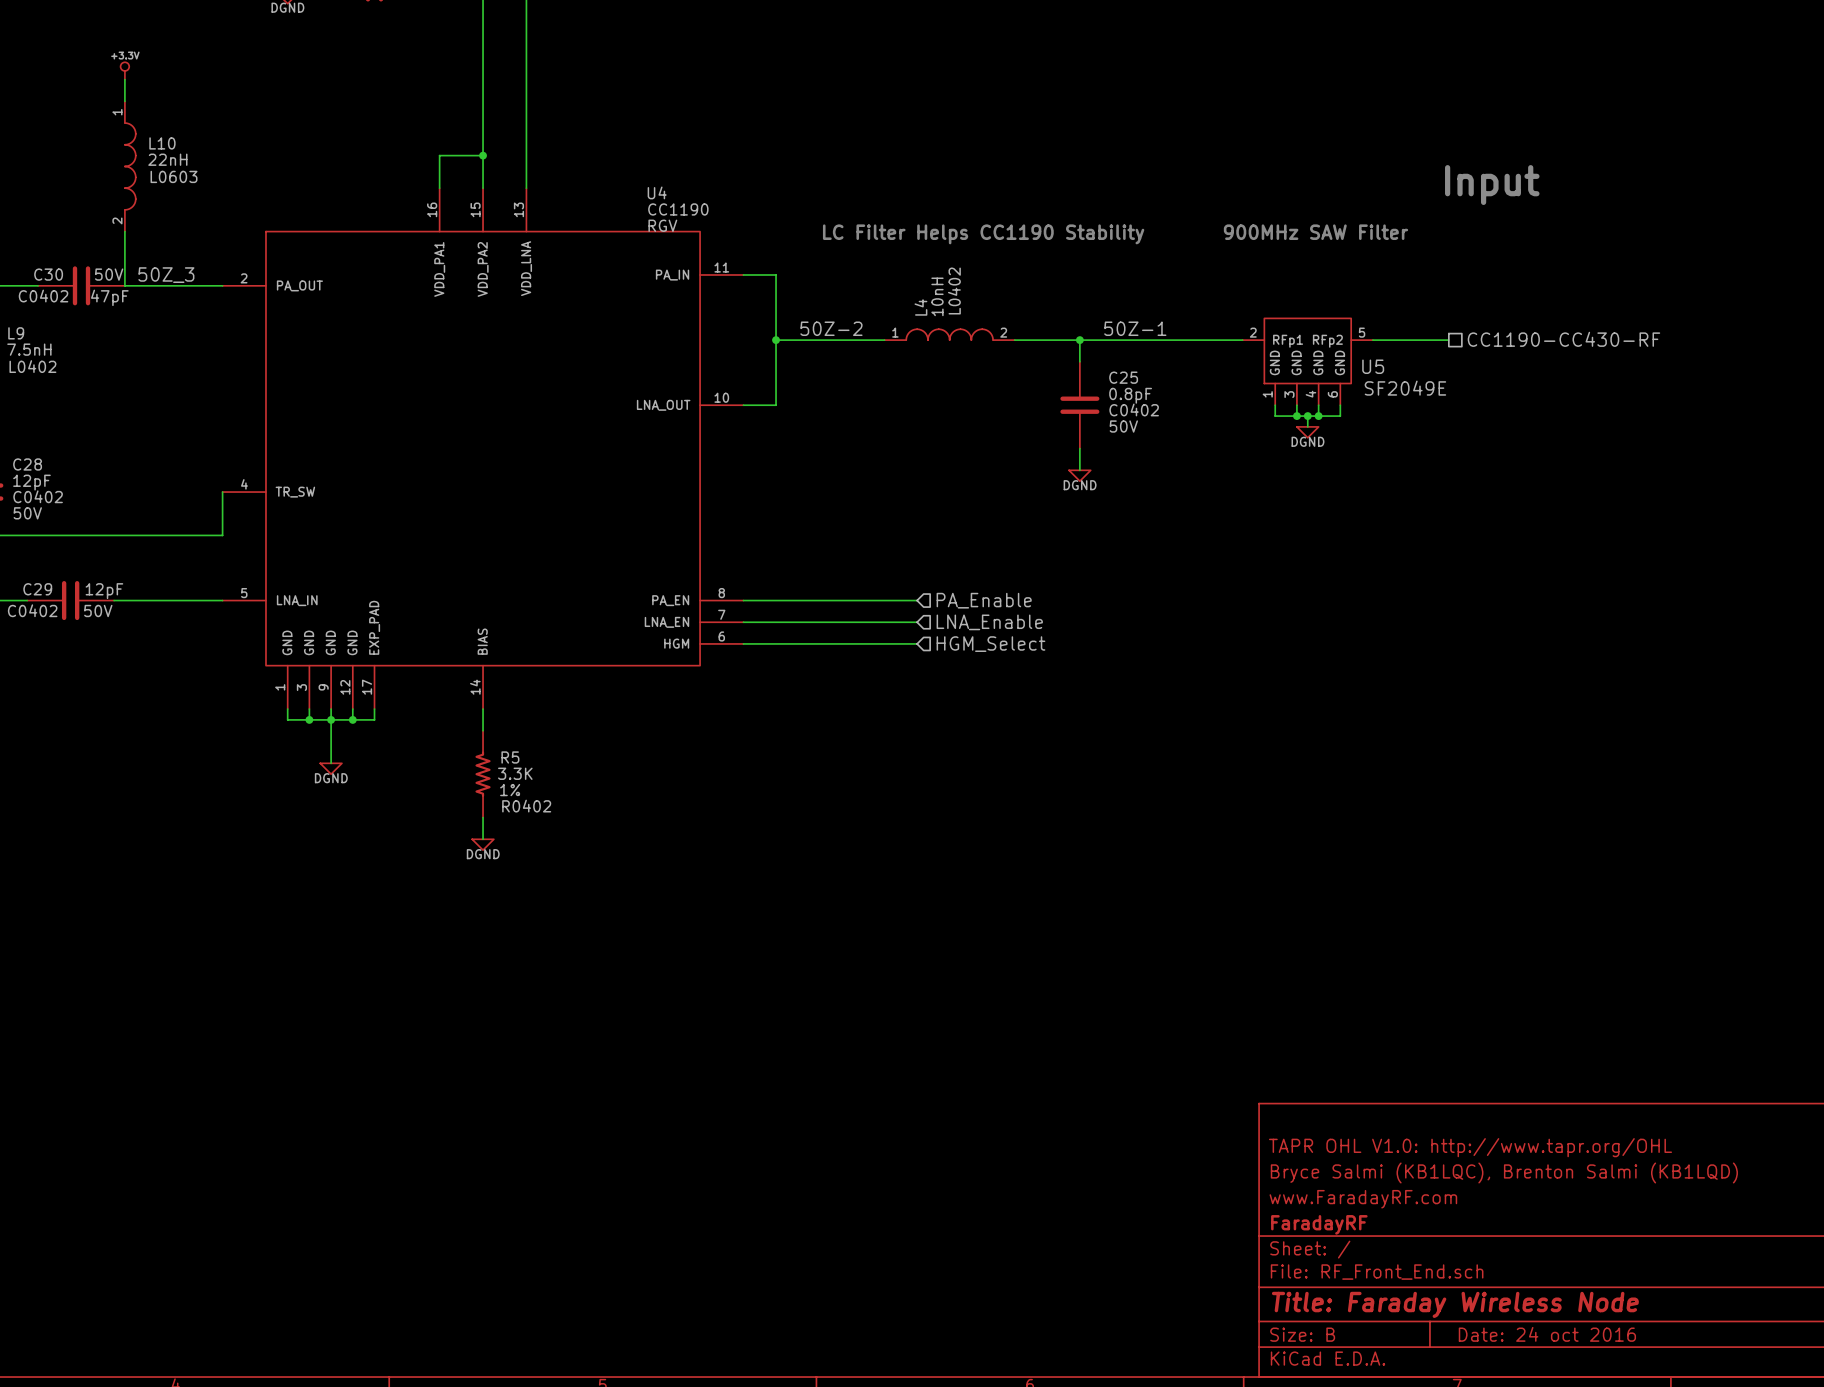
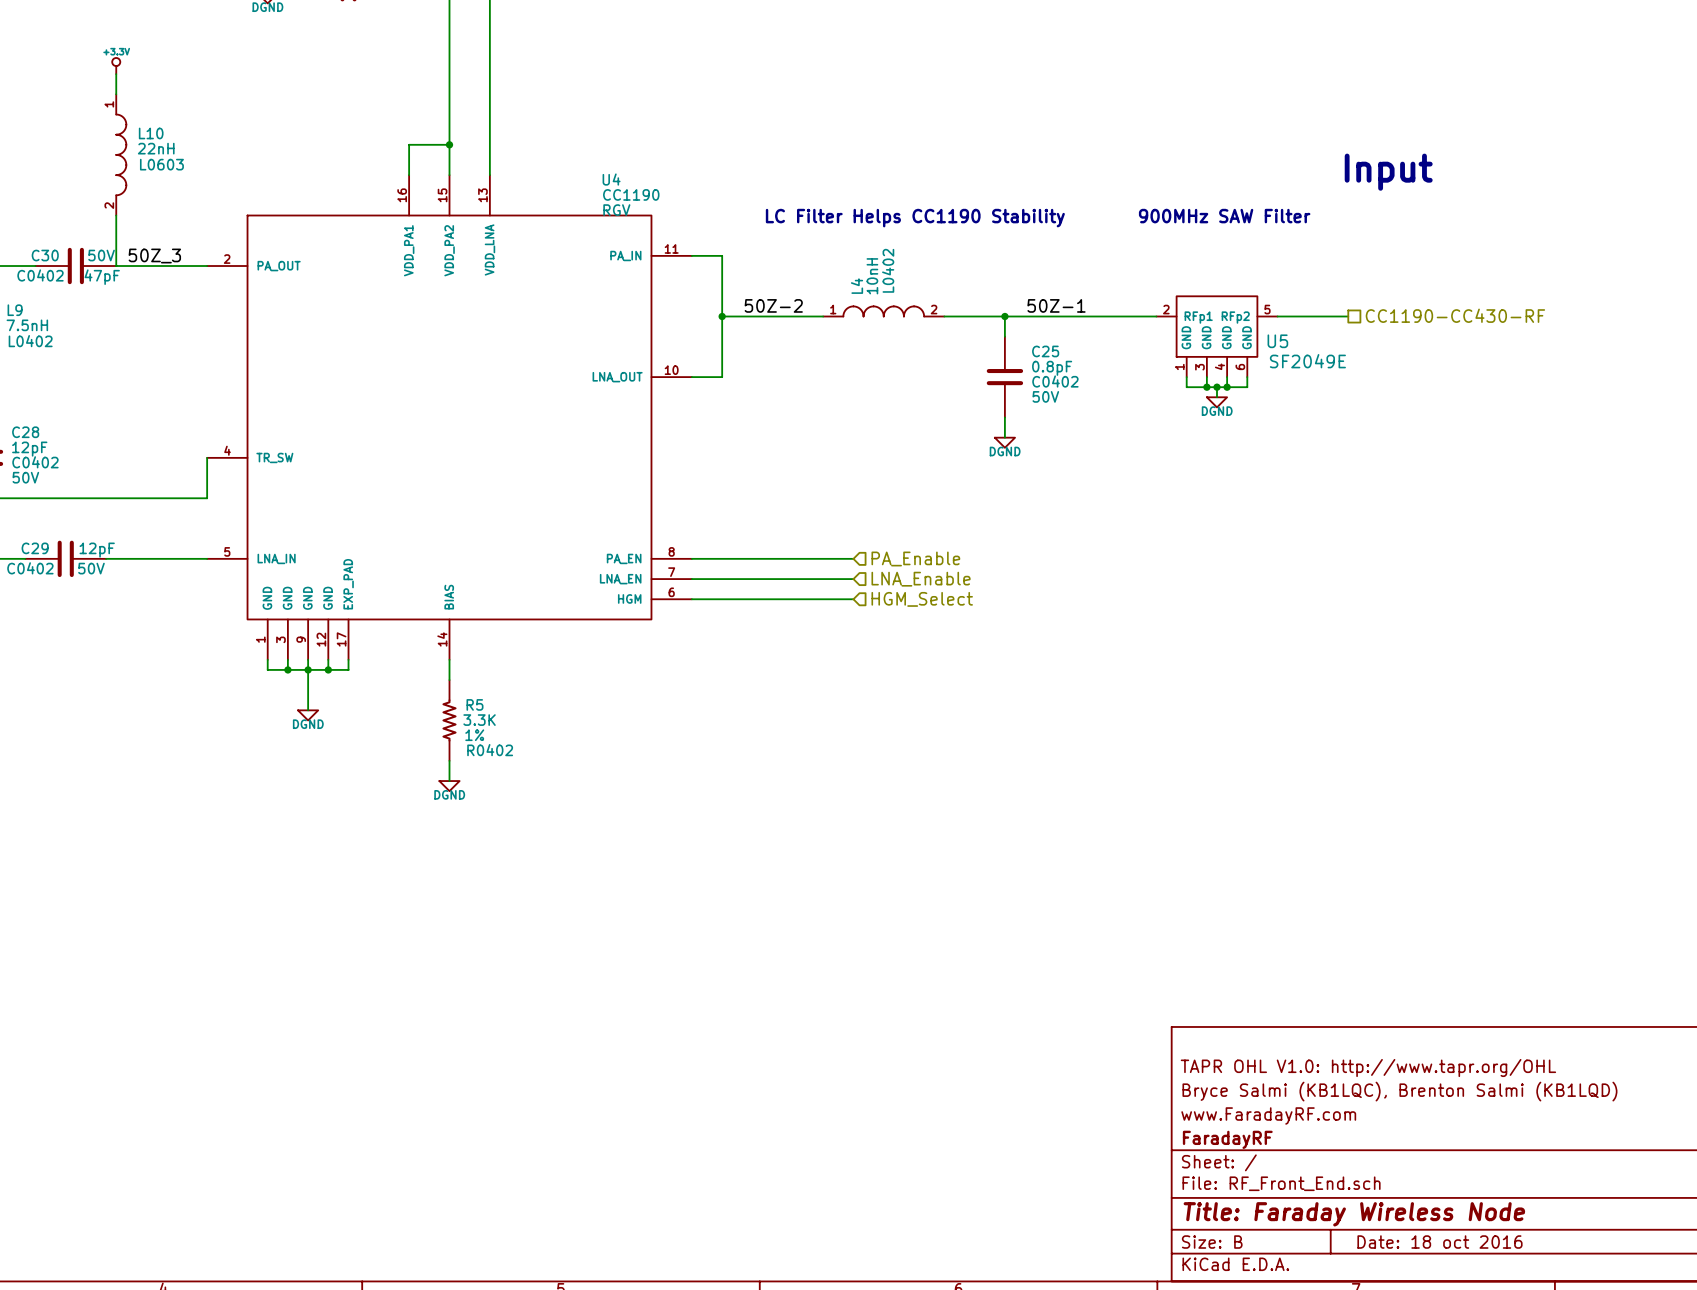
title block: Date: 24 oct 2016 (1547, 1334) -> Date: 18 oct 2016 (1439, 1242)

